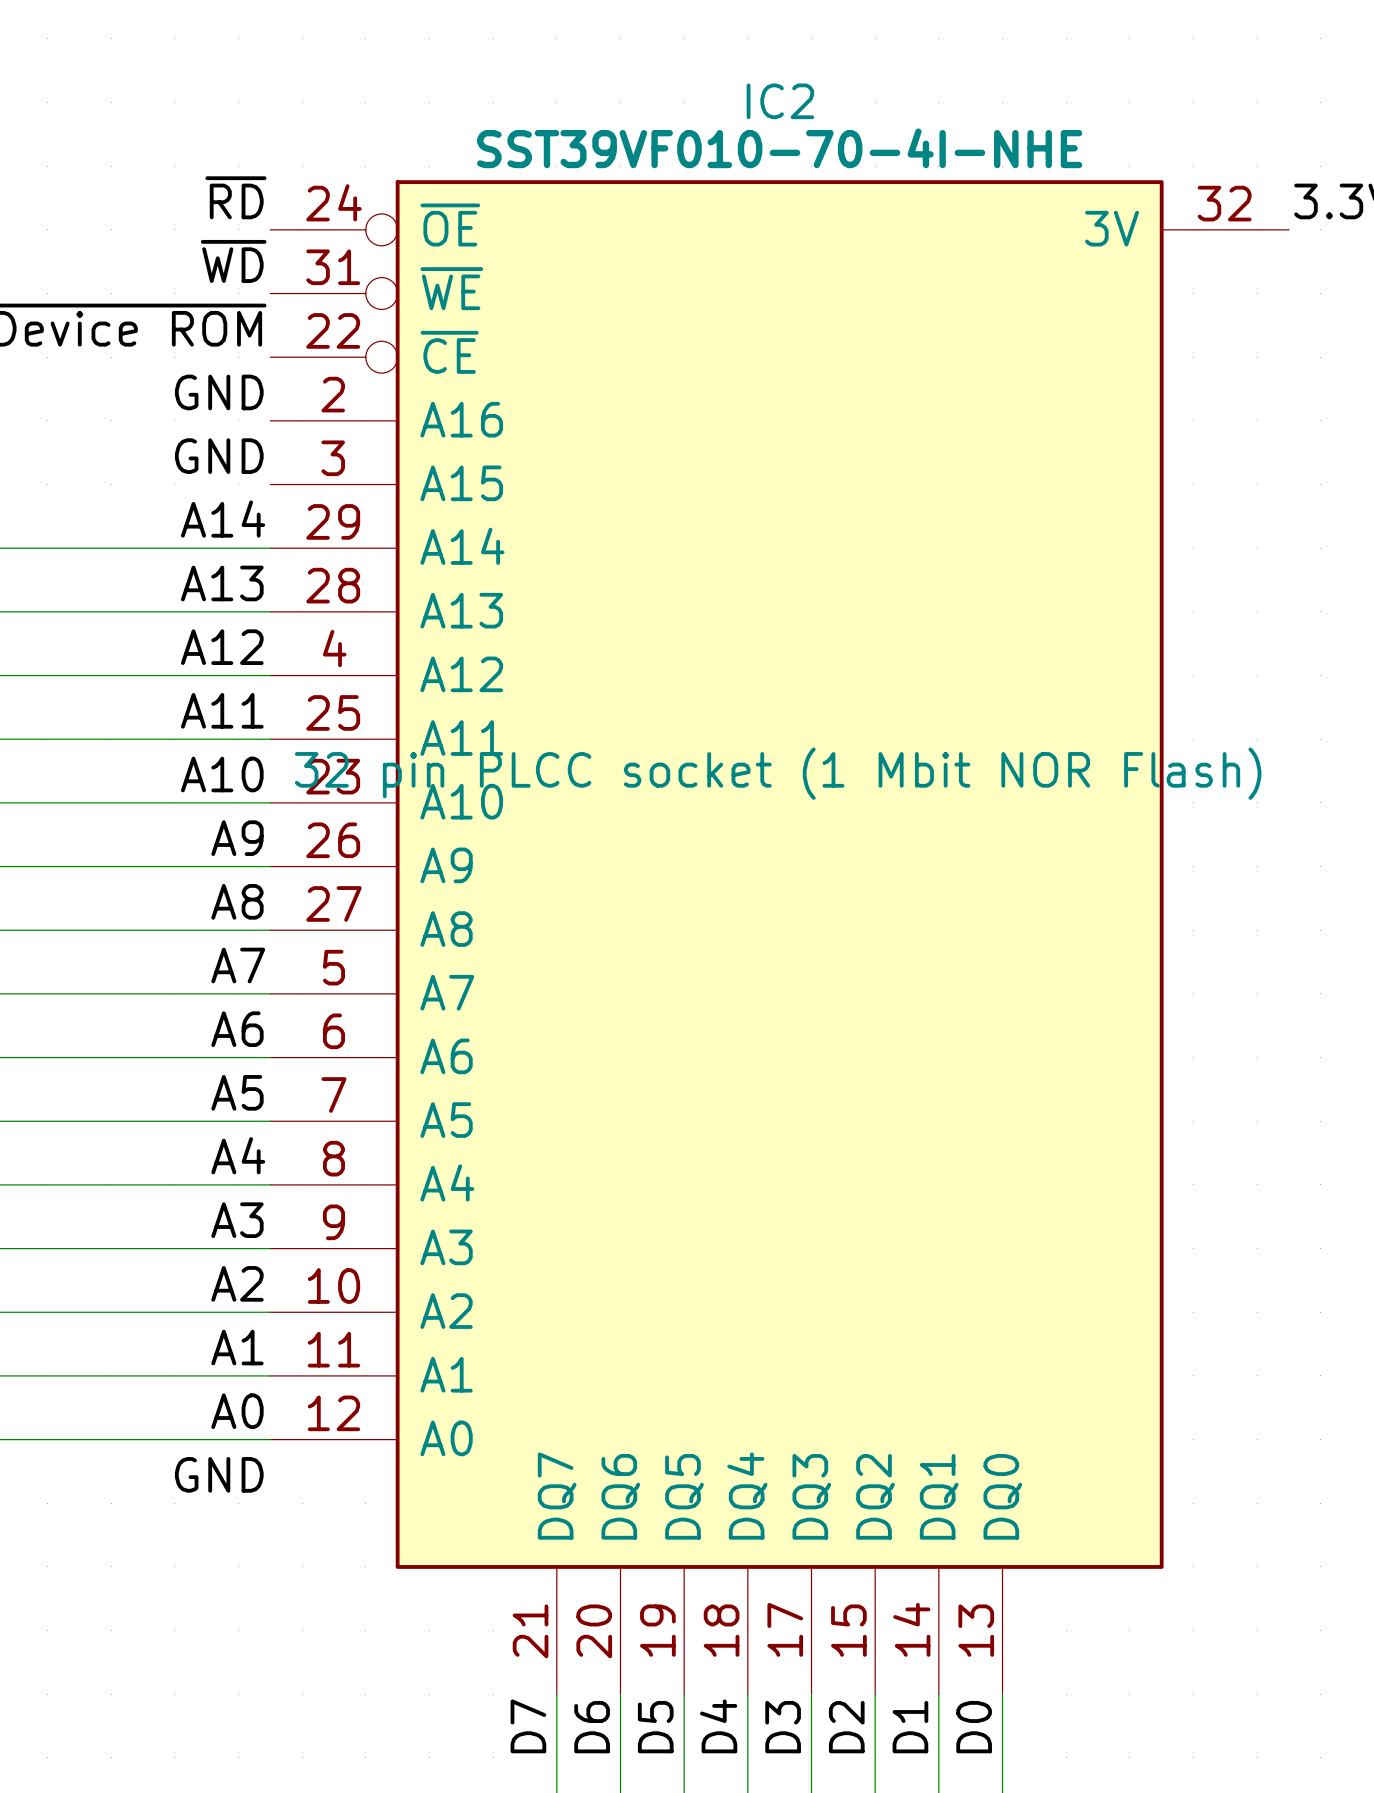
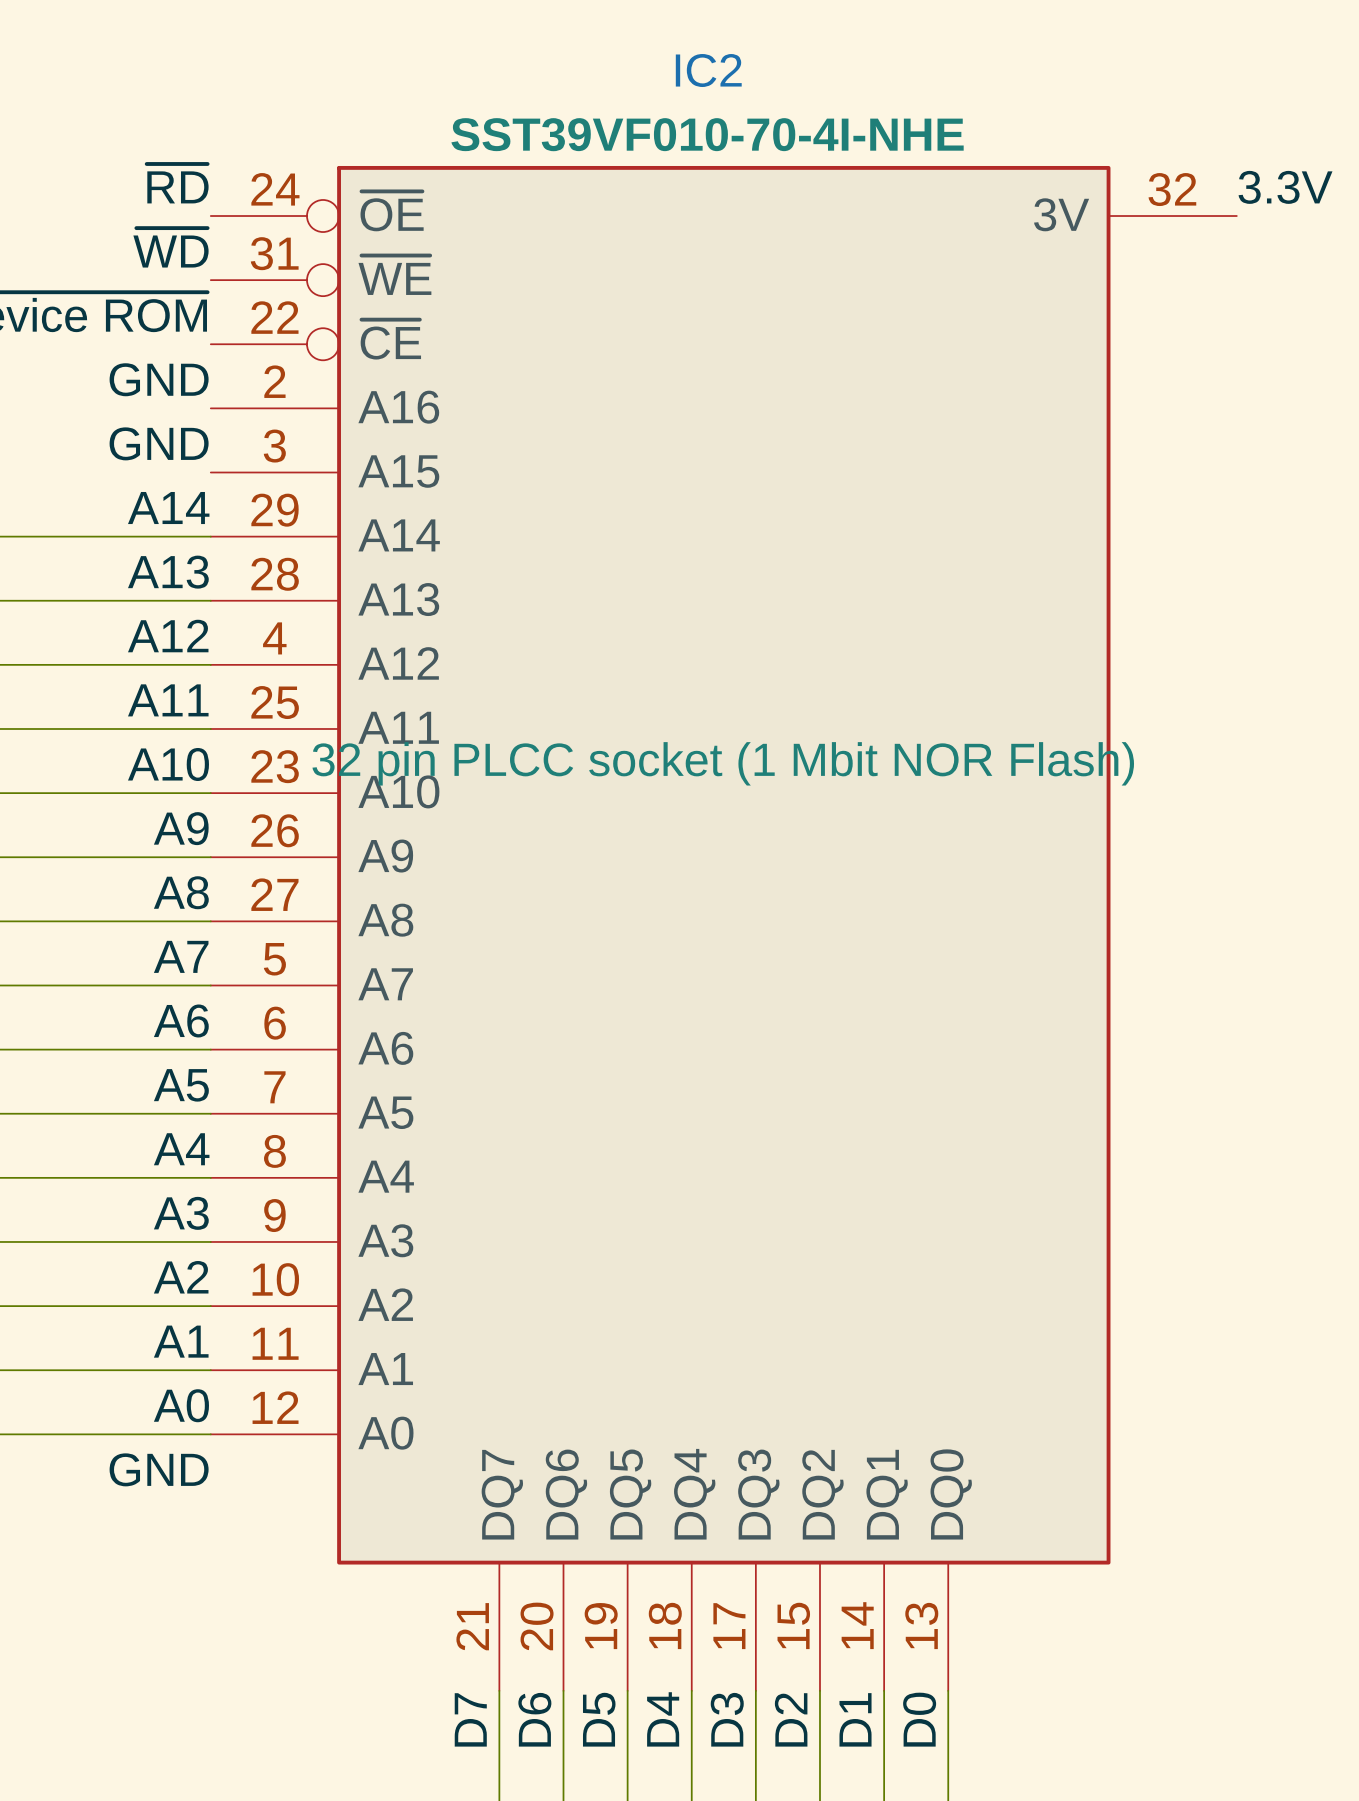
IC2 name position: IC2 (780, 101) -> IC2 (708, 70)
IC2 value position: SST39VF010-70-4I-NHE (779, 148) -> SST39VF010-70-4I-NHE (707, 134)

